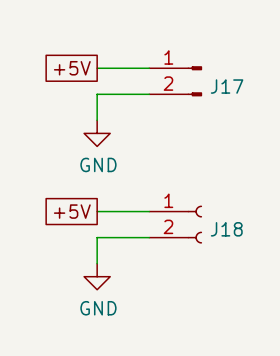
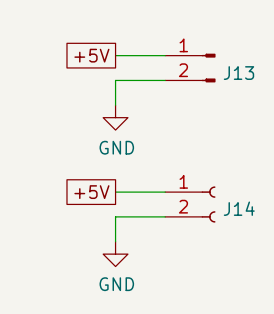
J17 name: J17 (227, 86) -> J13 (238, 73)
J18 name: J18 (226, 229) -> J14 (239, 208)

